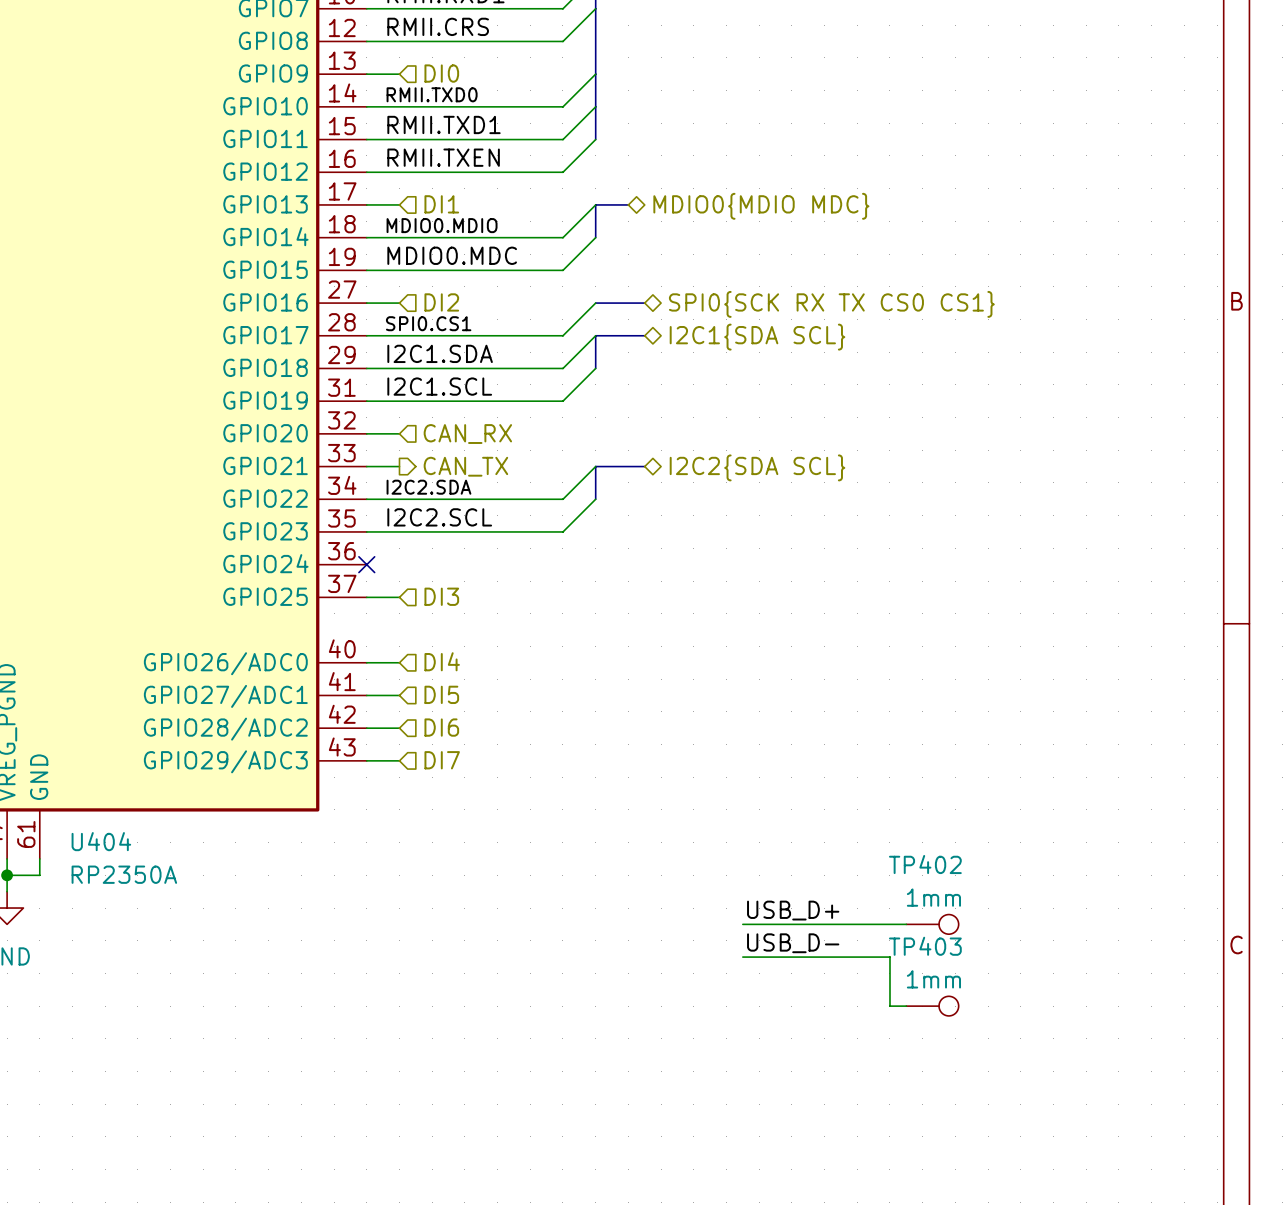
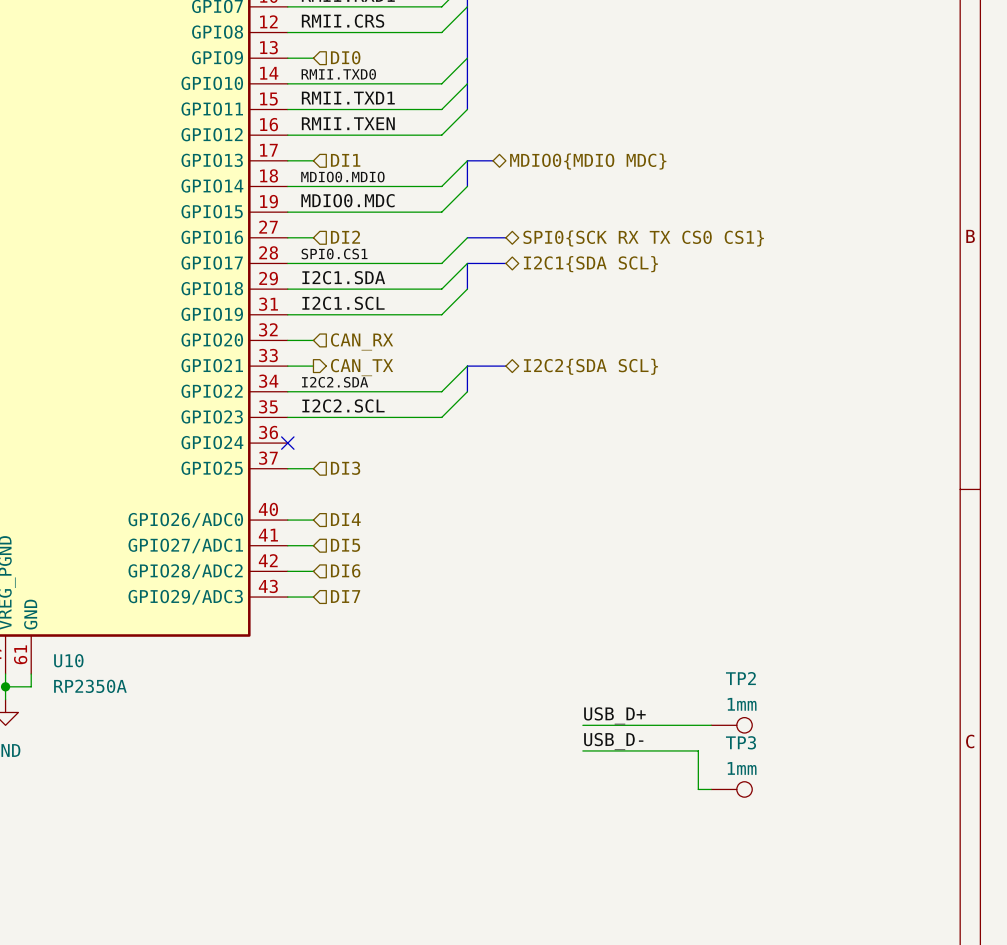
U404 name: U404 (101, 841) -> U10 (68, 660)
TP402 name: TP402 (925, 864) -> TP2 (740, 678)
TP403 name: TP403 (925, 946) -> TP3 (741, 742)

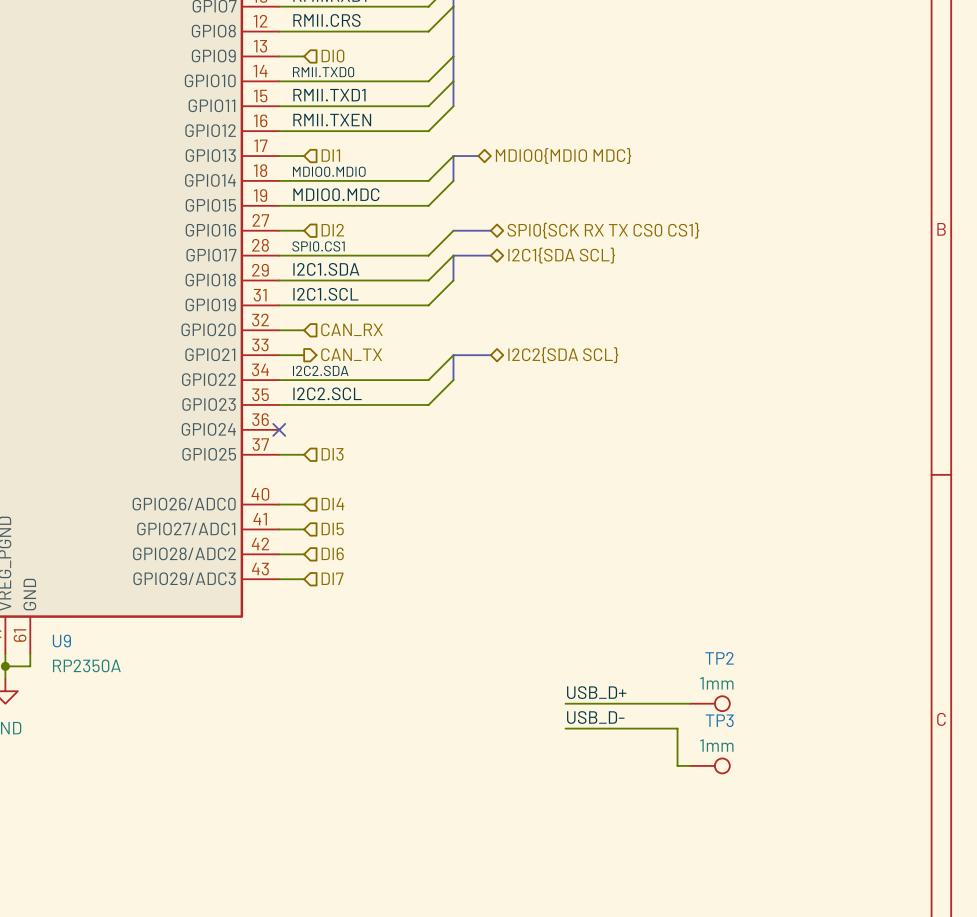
U10 name: U10 (68, 660) -> U9 (61, 641)

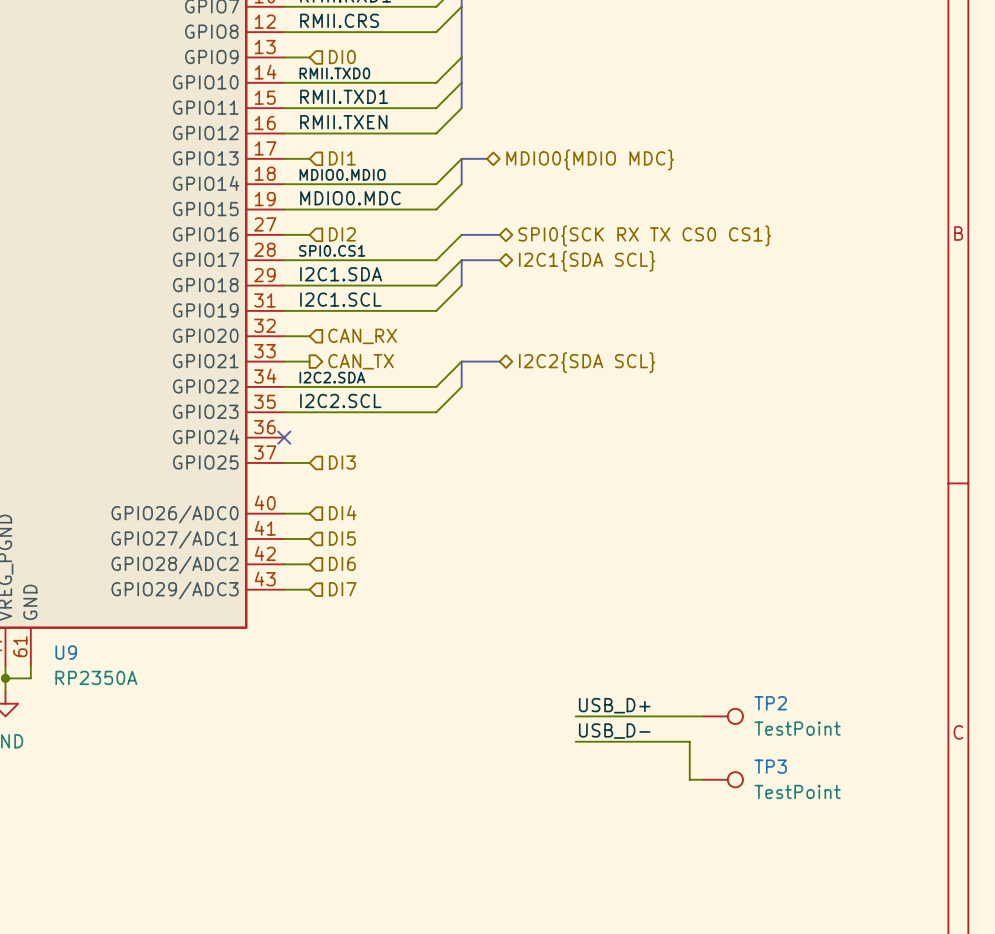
TP2 name position: TP2 (719, 658) -> TP2 (770, 703)
TP2 value: 1mm (716, 683) -> TestPoint (797, 728)
TP3 name position: TP3 (719, 720) -> TP3 (770, 766)
TP3 value: 1mm (716, 745) -> TestPoint (797, 791)

